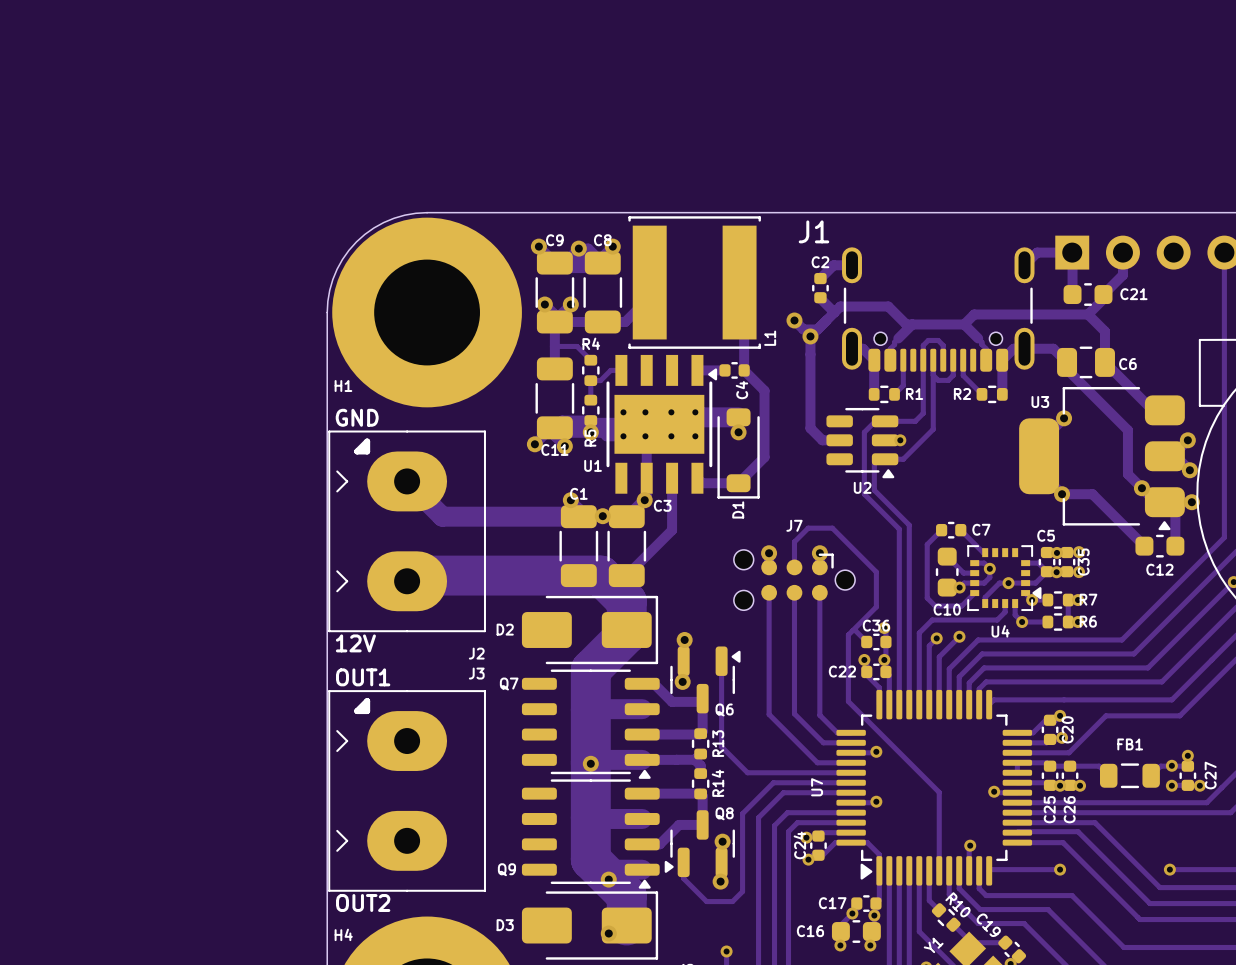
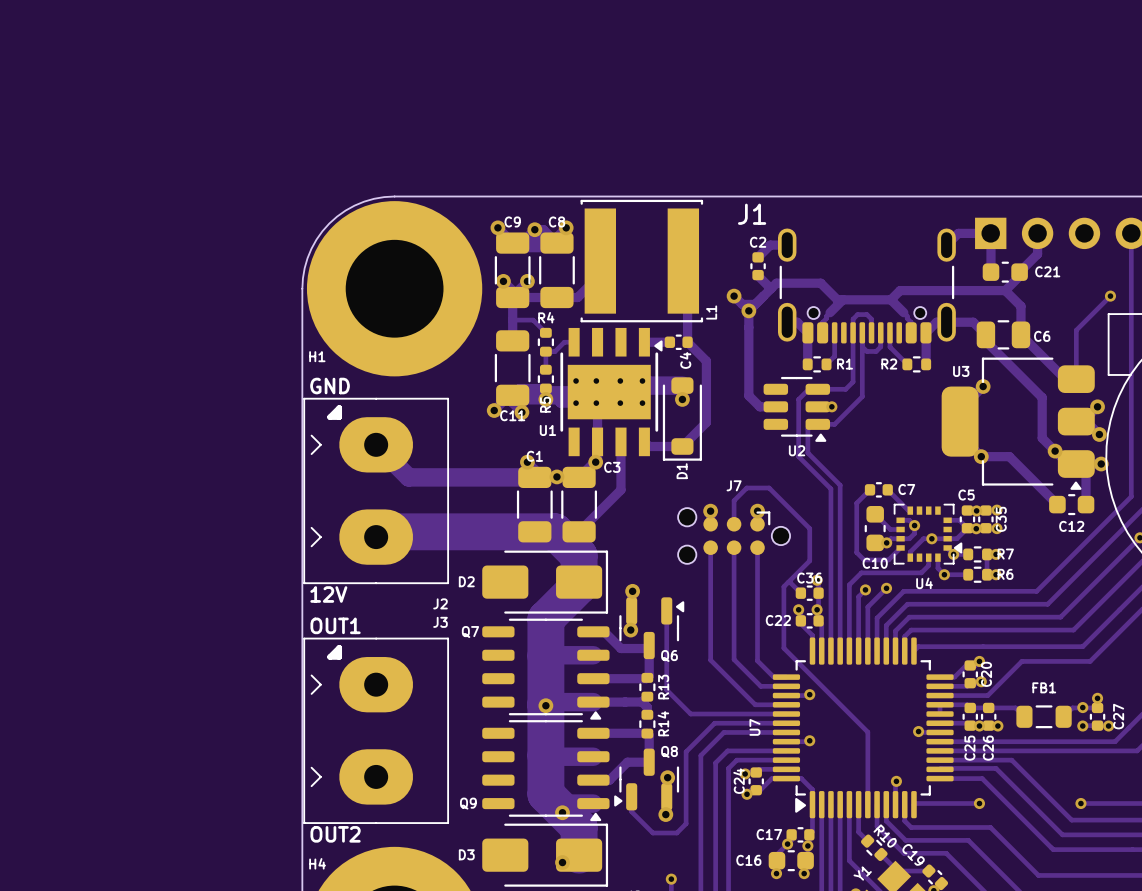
track: none -> (1110, 296) (1076, 330) (1076, 379)
via: none -> (1110, 296)

